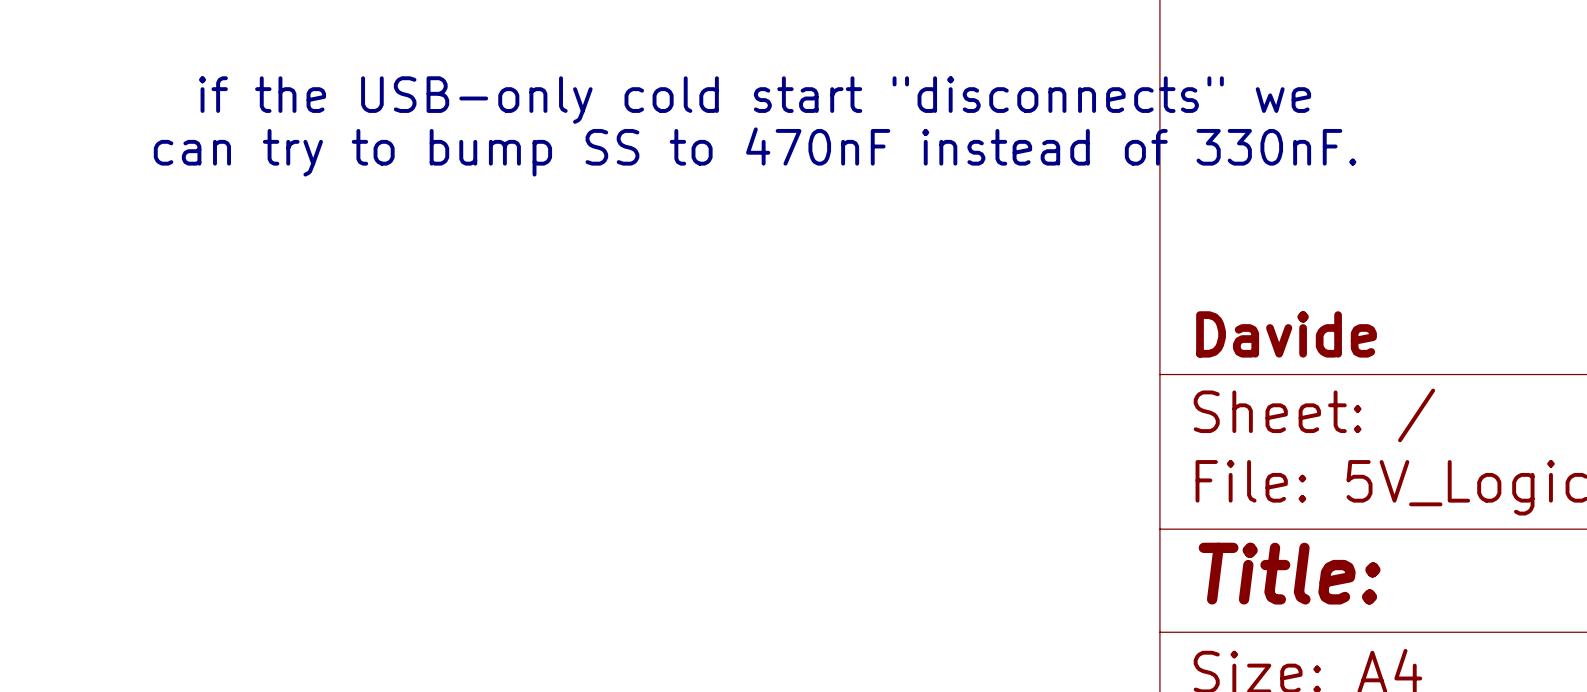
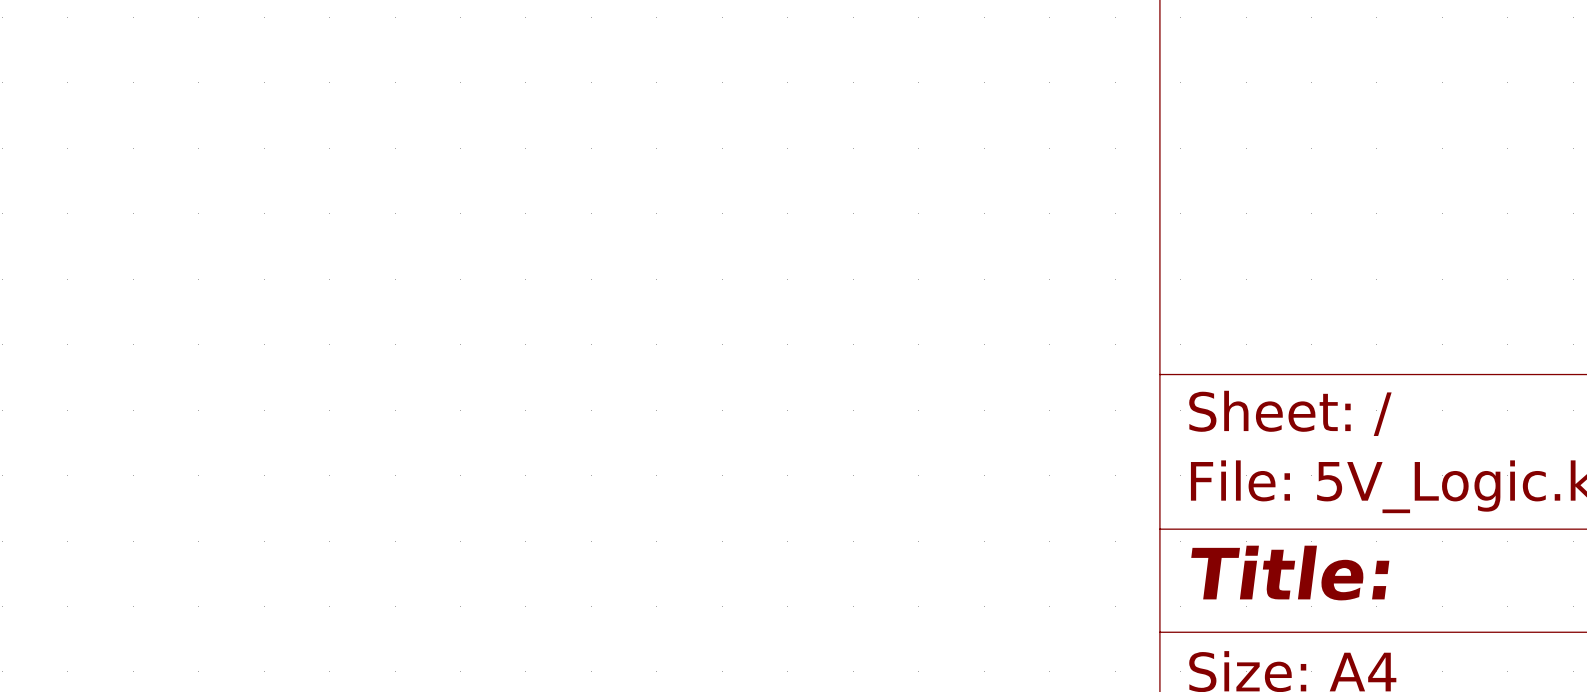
text: if the USB-only cold start "disconnects" we (755, 100) -> none
text: can try to bump SS to 470nF instead of 330nF. (755, 151) -> none
title block: Davide (1286, 334) -> none

